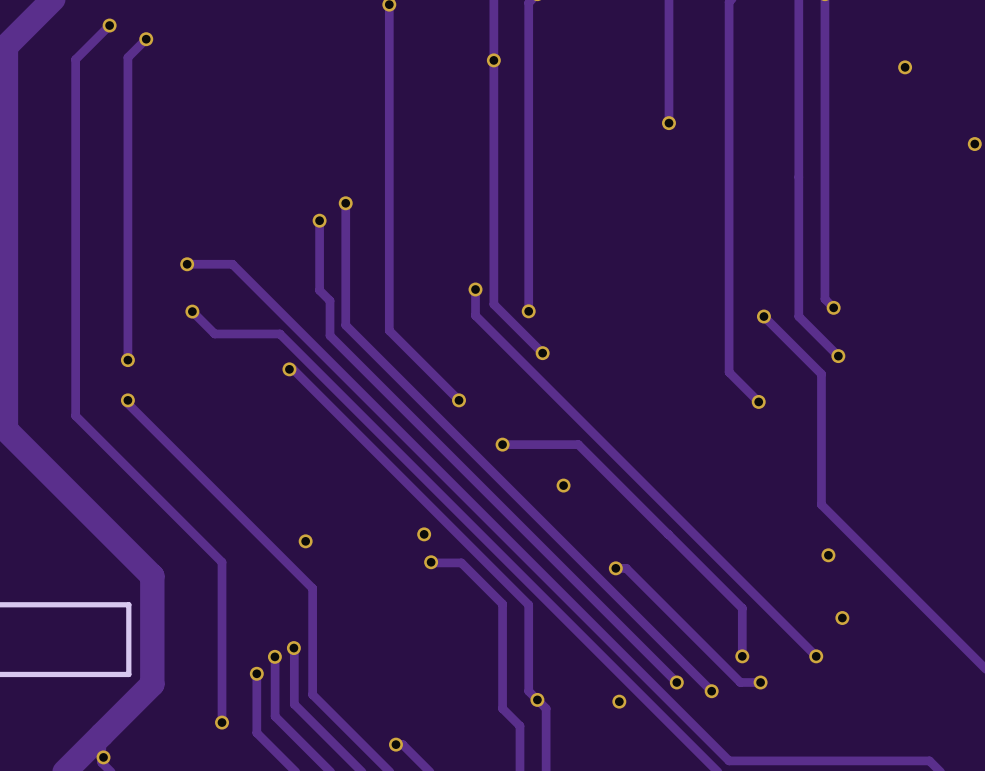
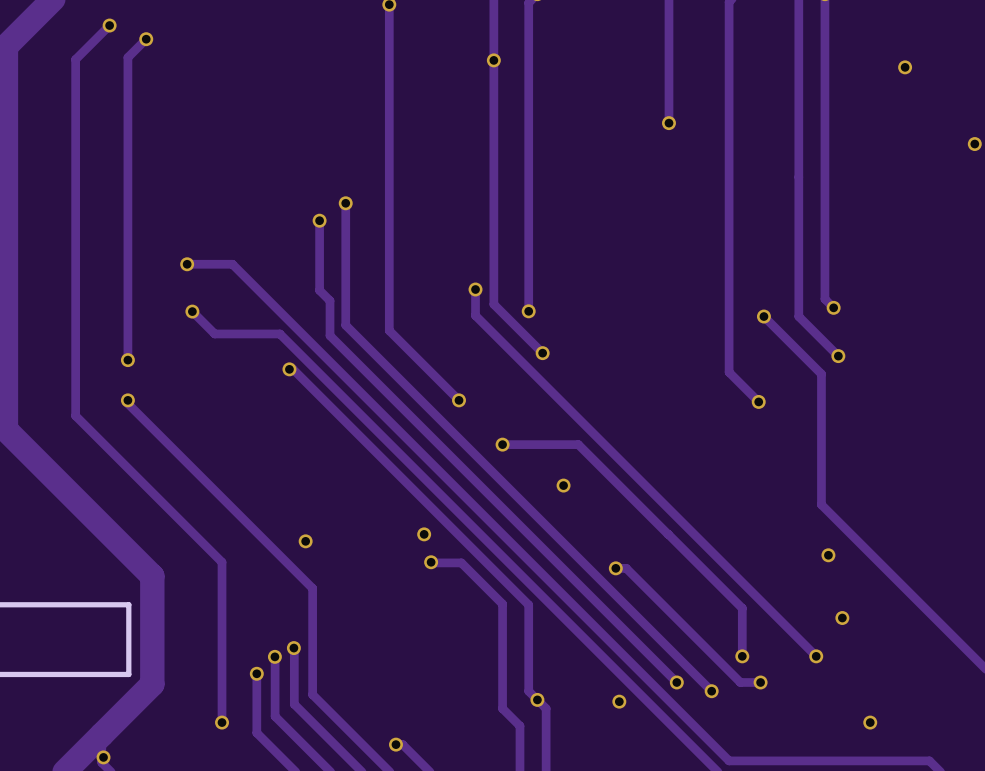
via: none -> (870, 722)

